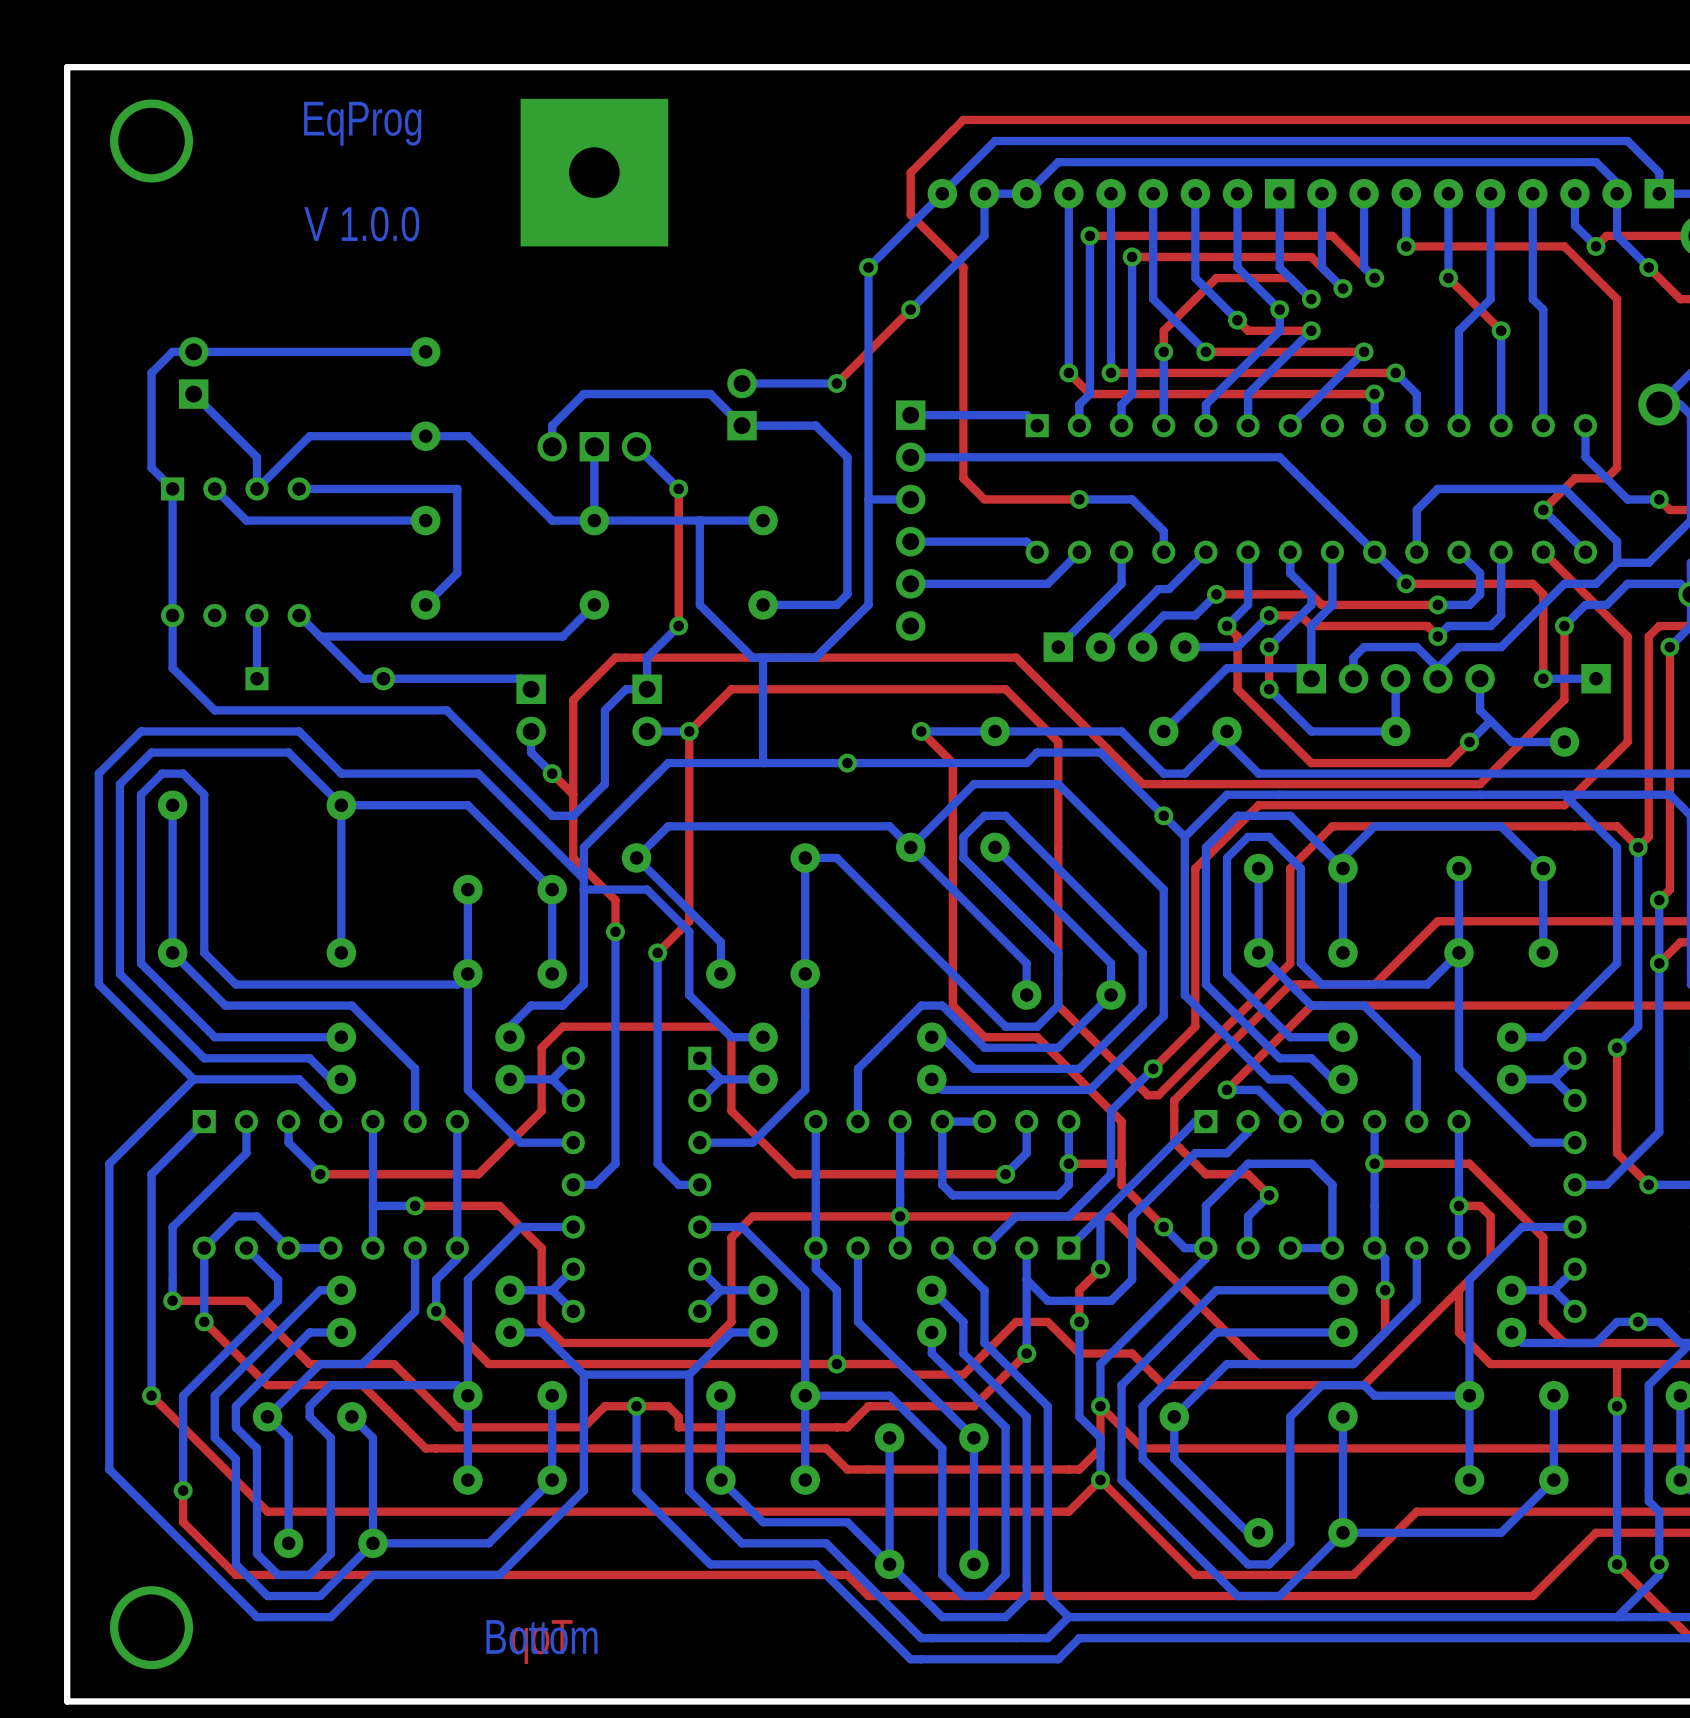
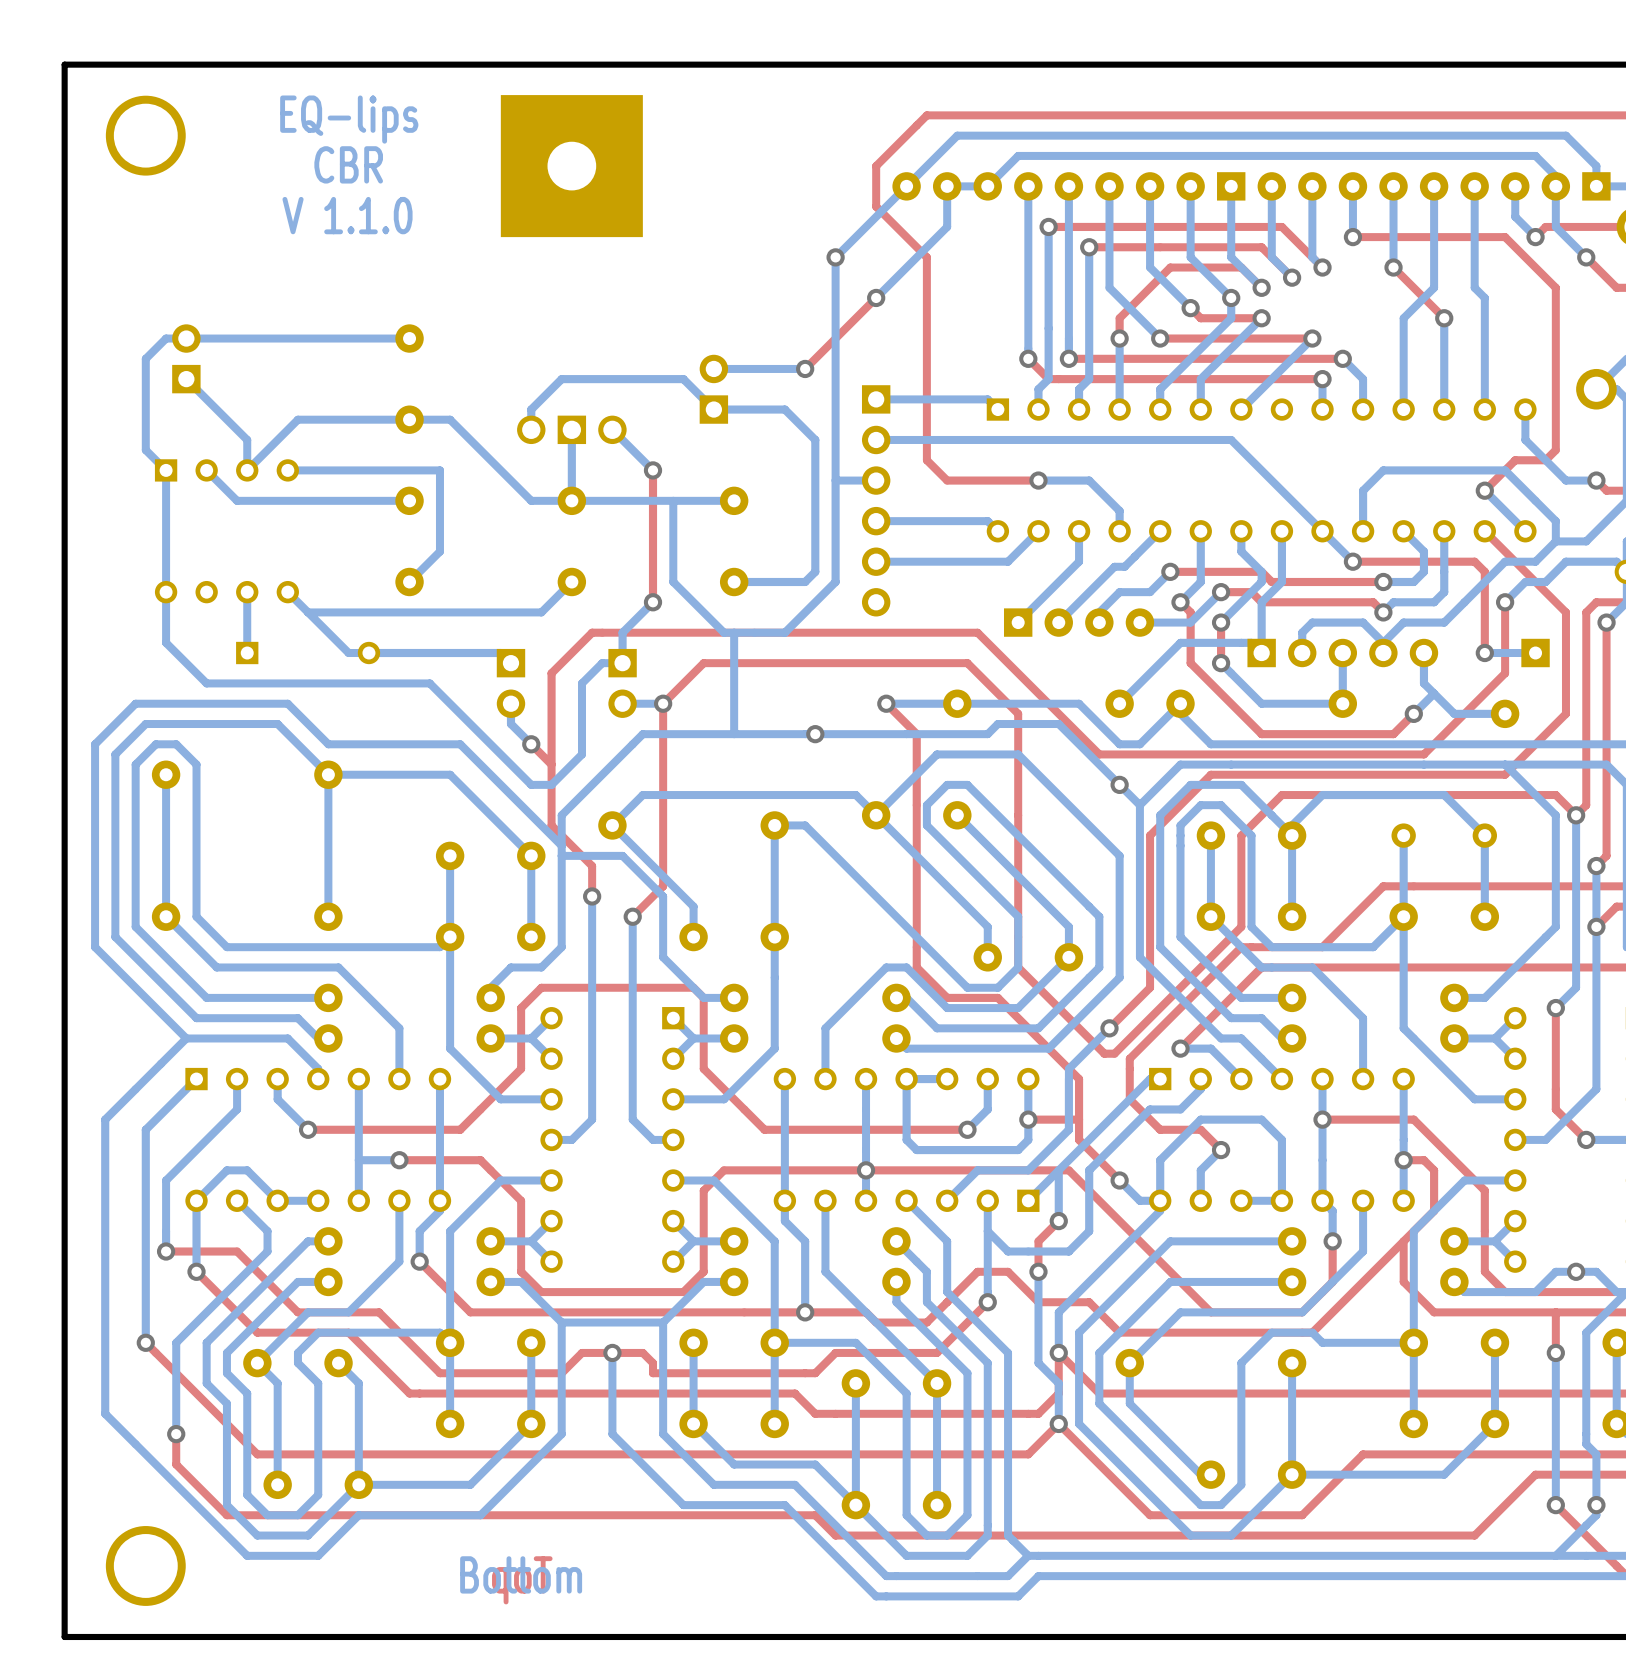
text: EqProg (362, 123) -> EQ-lips (349, 119)
text: none -> CBR (348, 164)
text: V 1.0.0 (361, 224) -> V 1.1.0 (347, 215)

